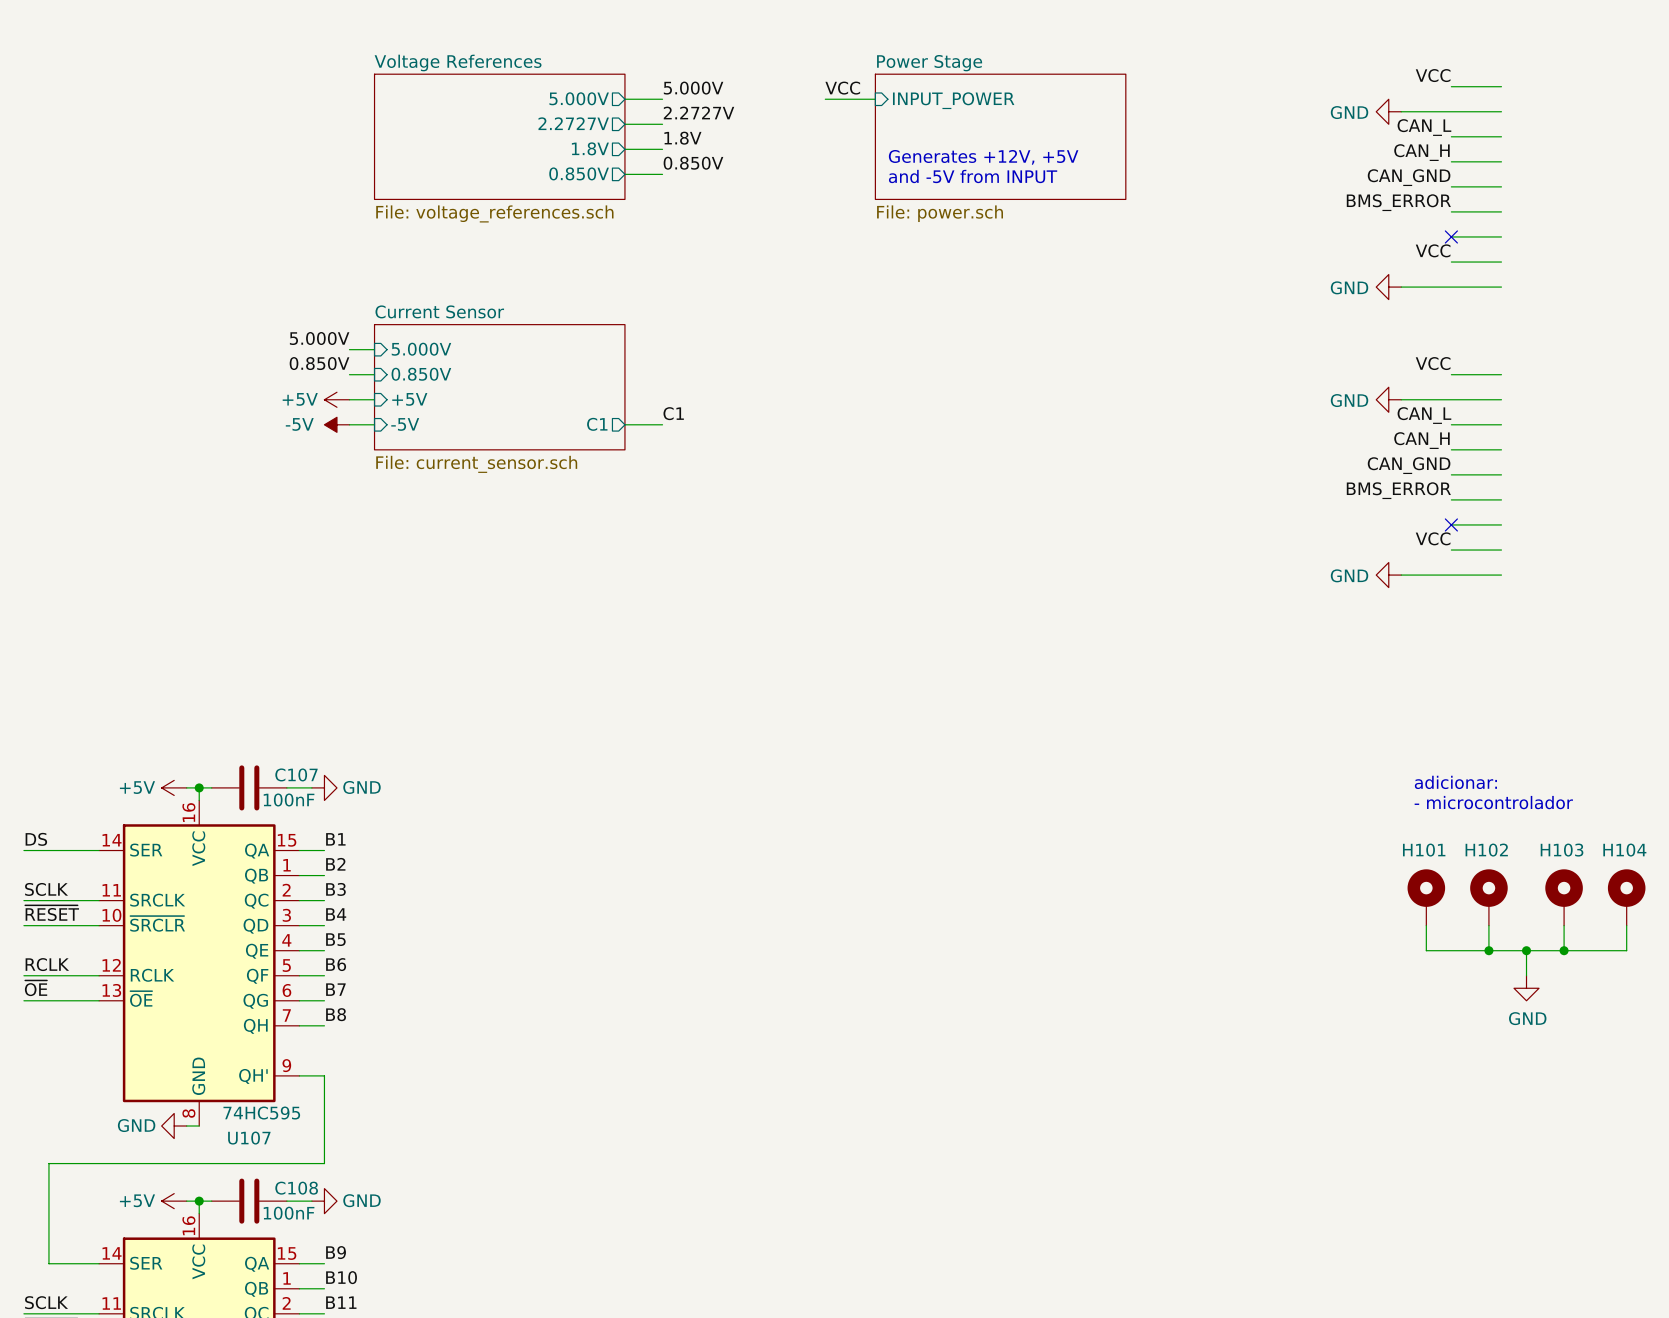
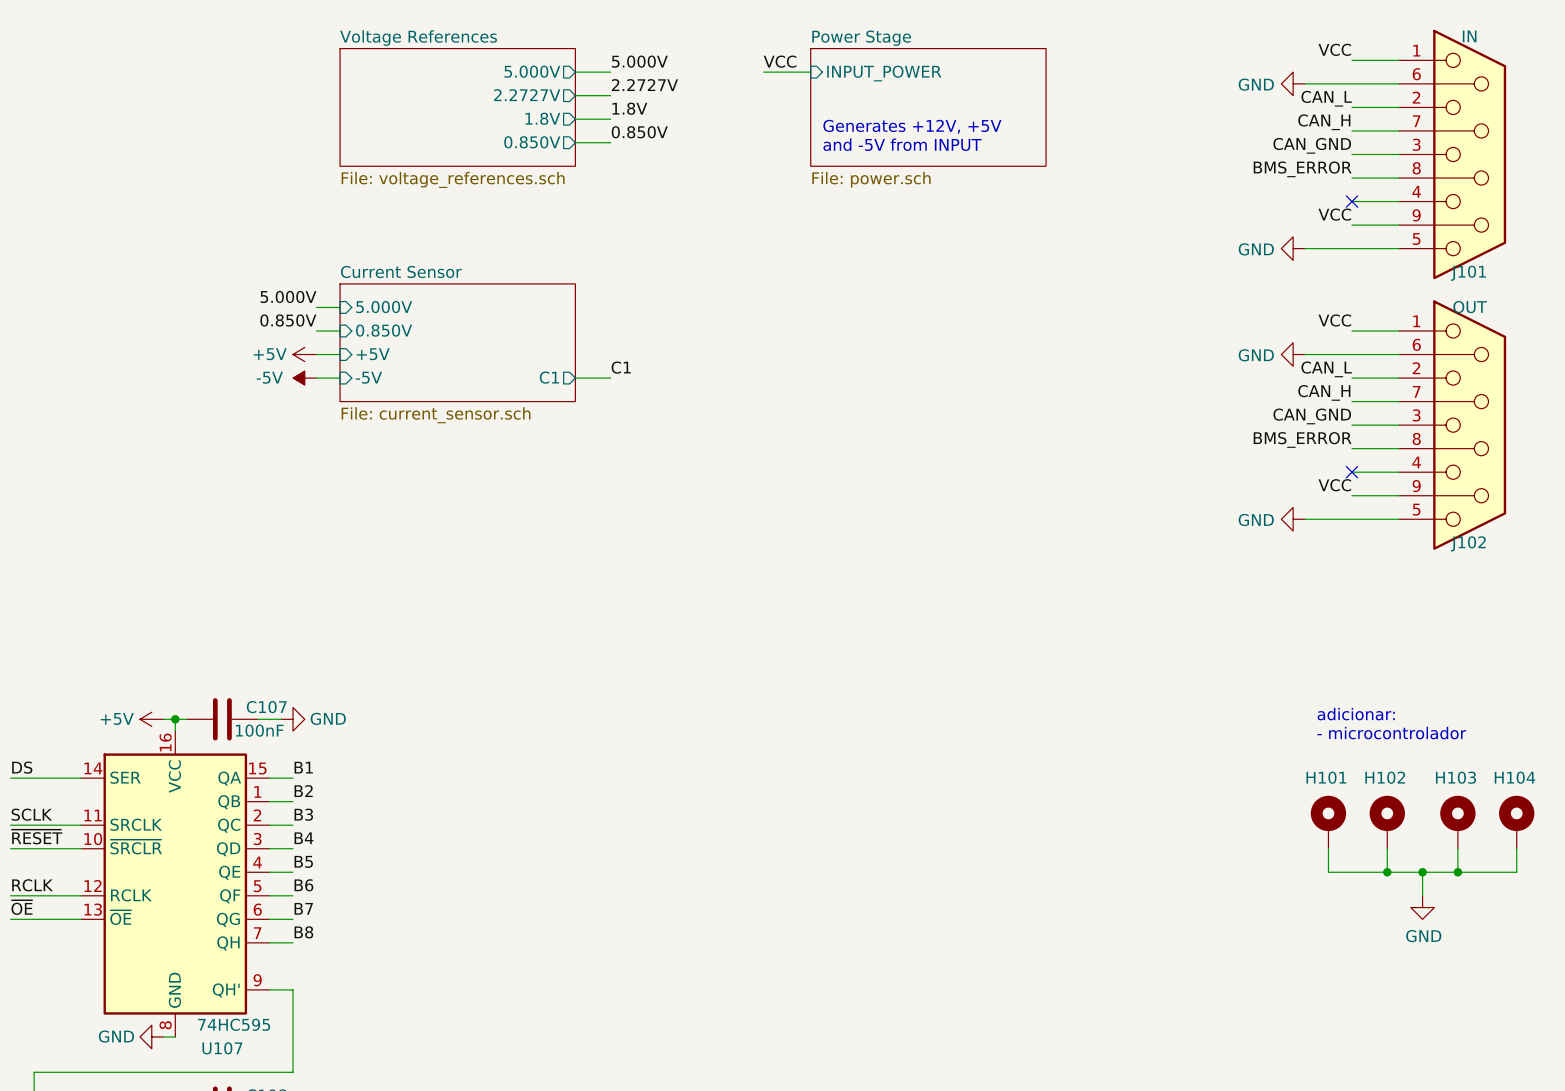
J101: none -> IN (1452, 154)
J102: none -> OUT (1452, 425)

